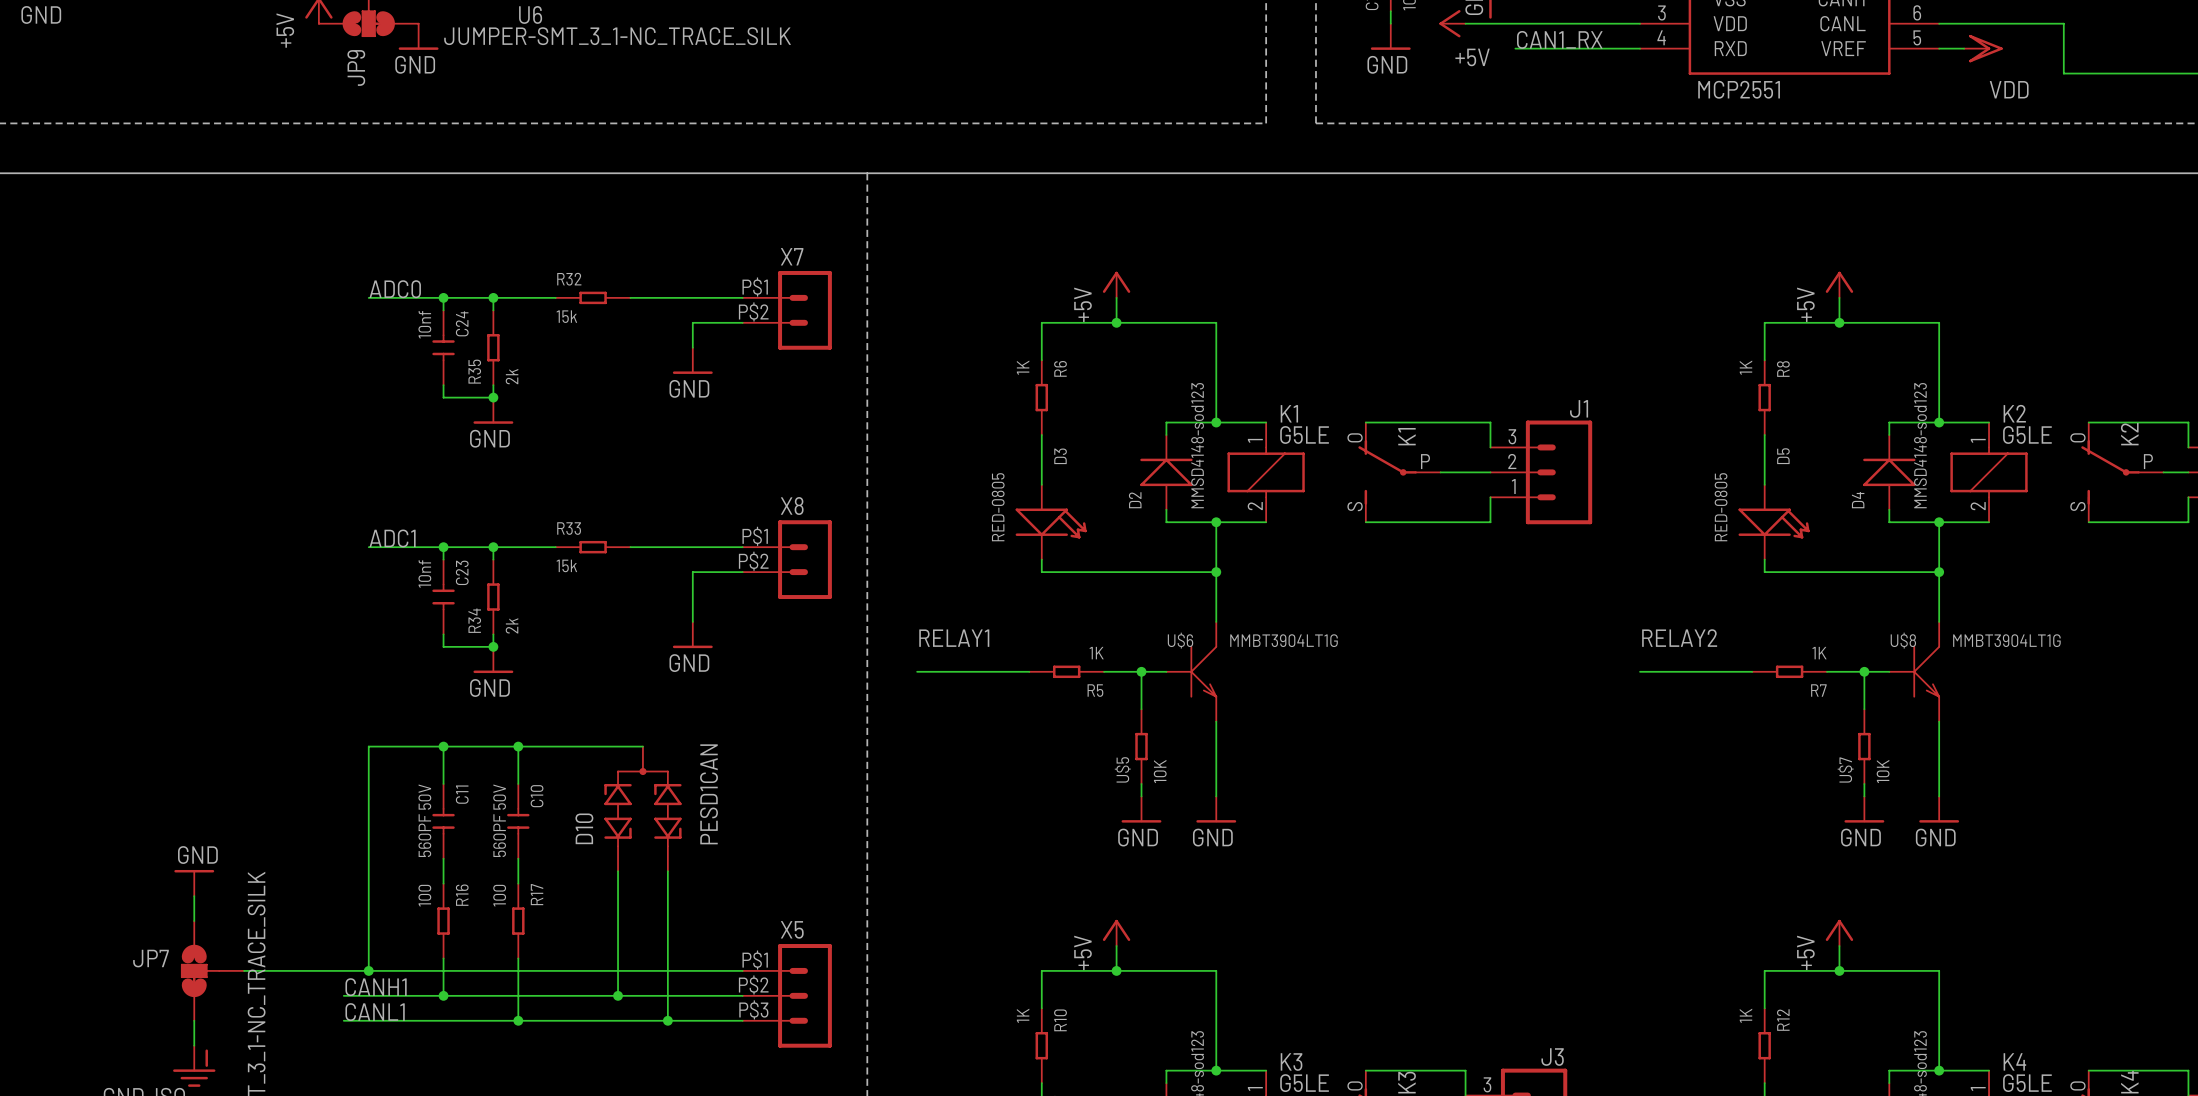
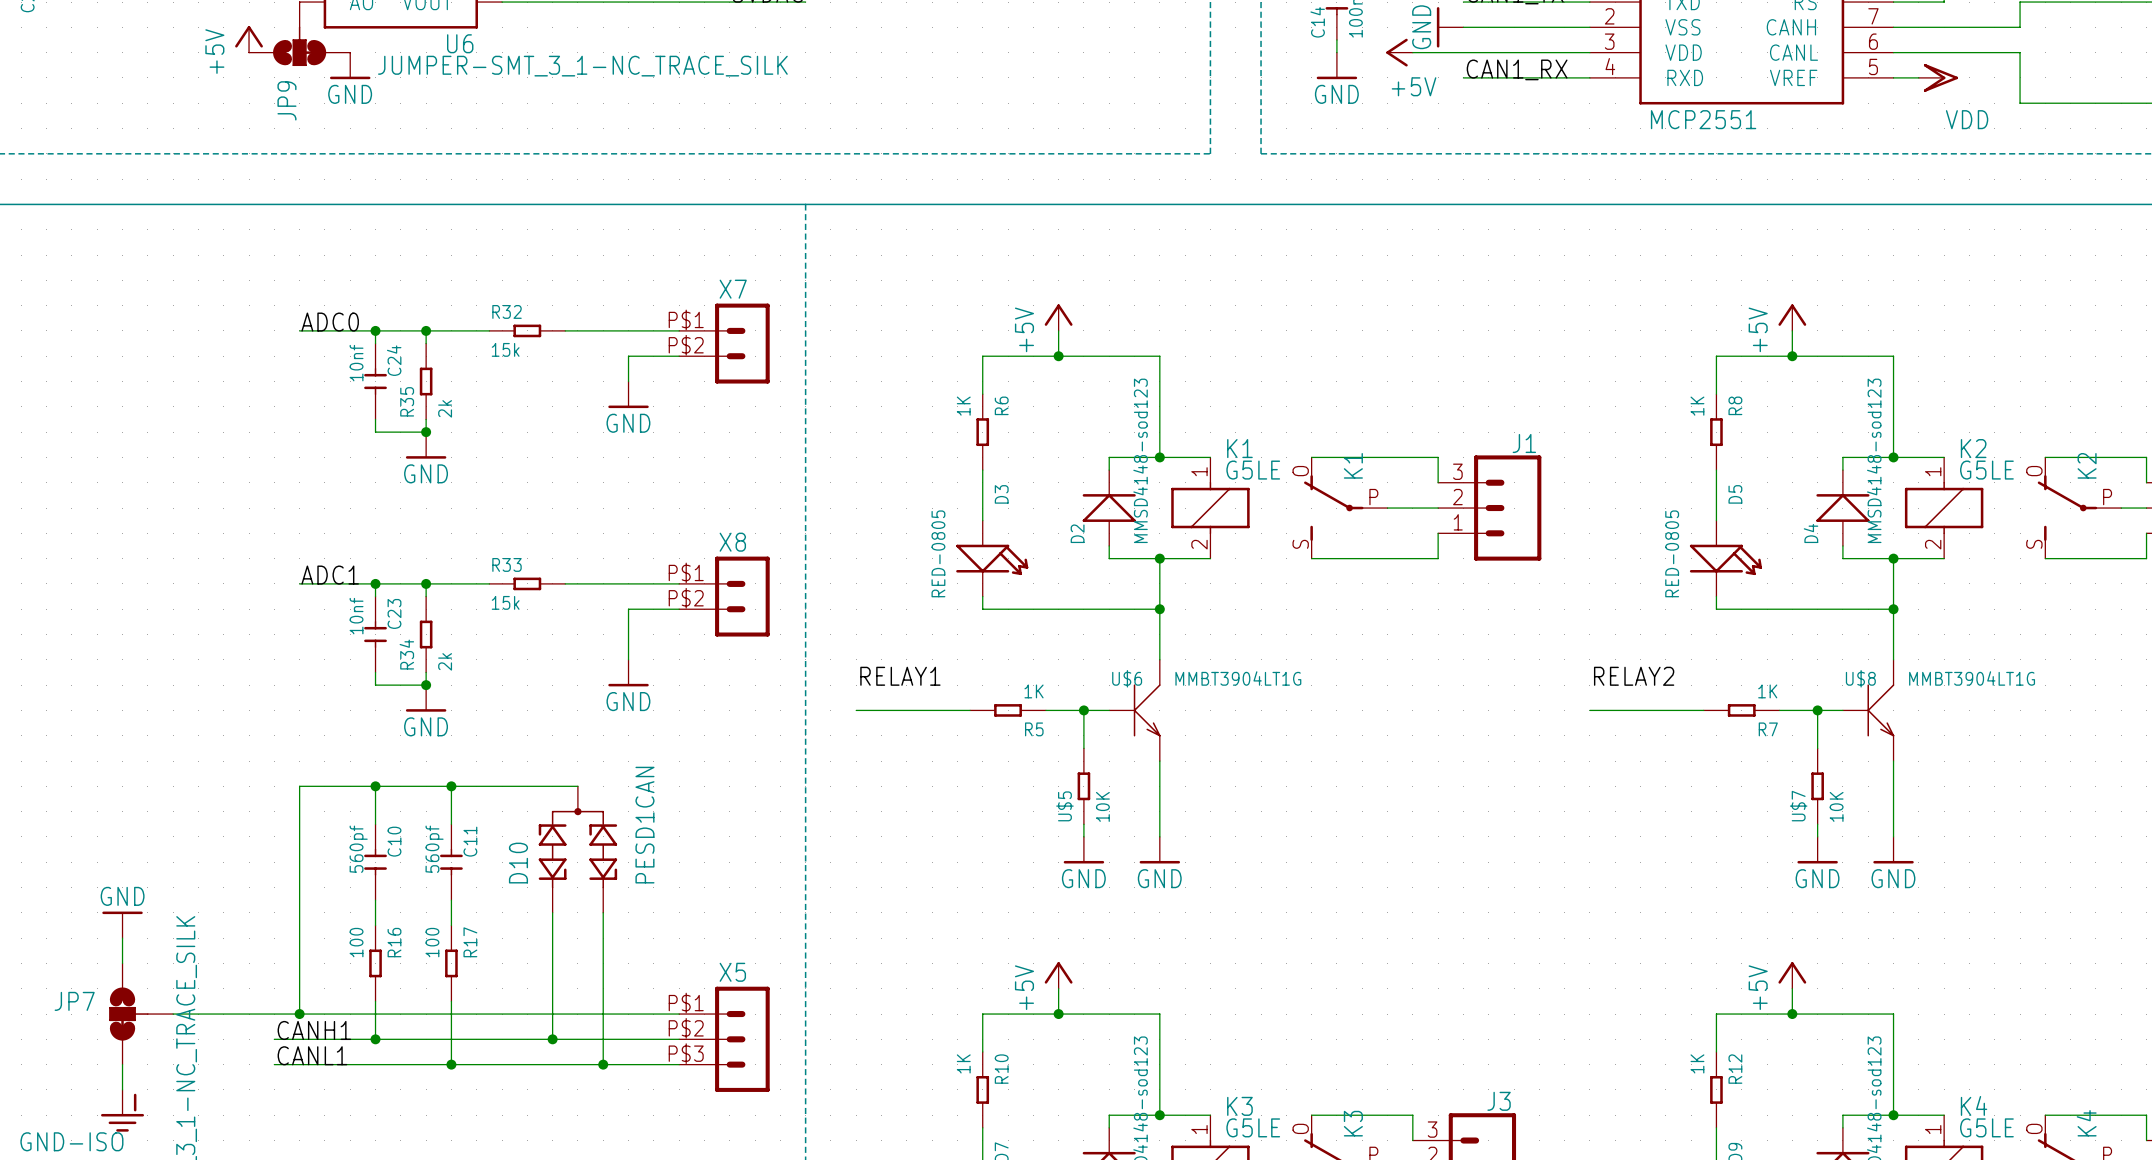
C11 name: C11 (462, 794) -> C10 (394, 841)
C10 name: C10 (537, 796) -> C11 (470, 841)
C11 value: 560PF 50V (424, 820) -> 560pf (358, 849)
C10 value: 560PF 50V (499, 820) -> 560pf (434, 849)

